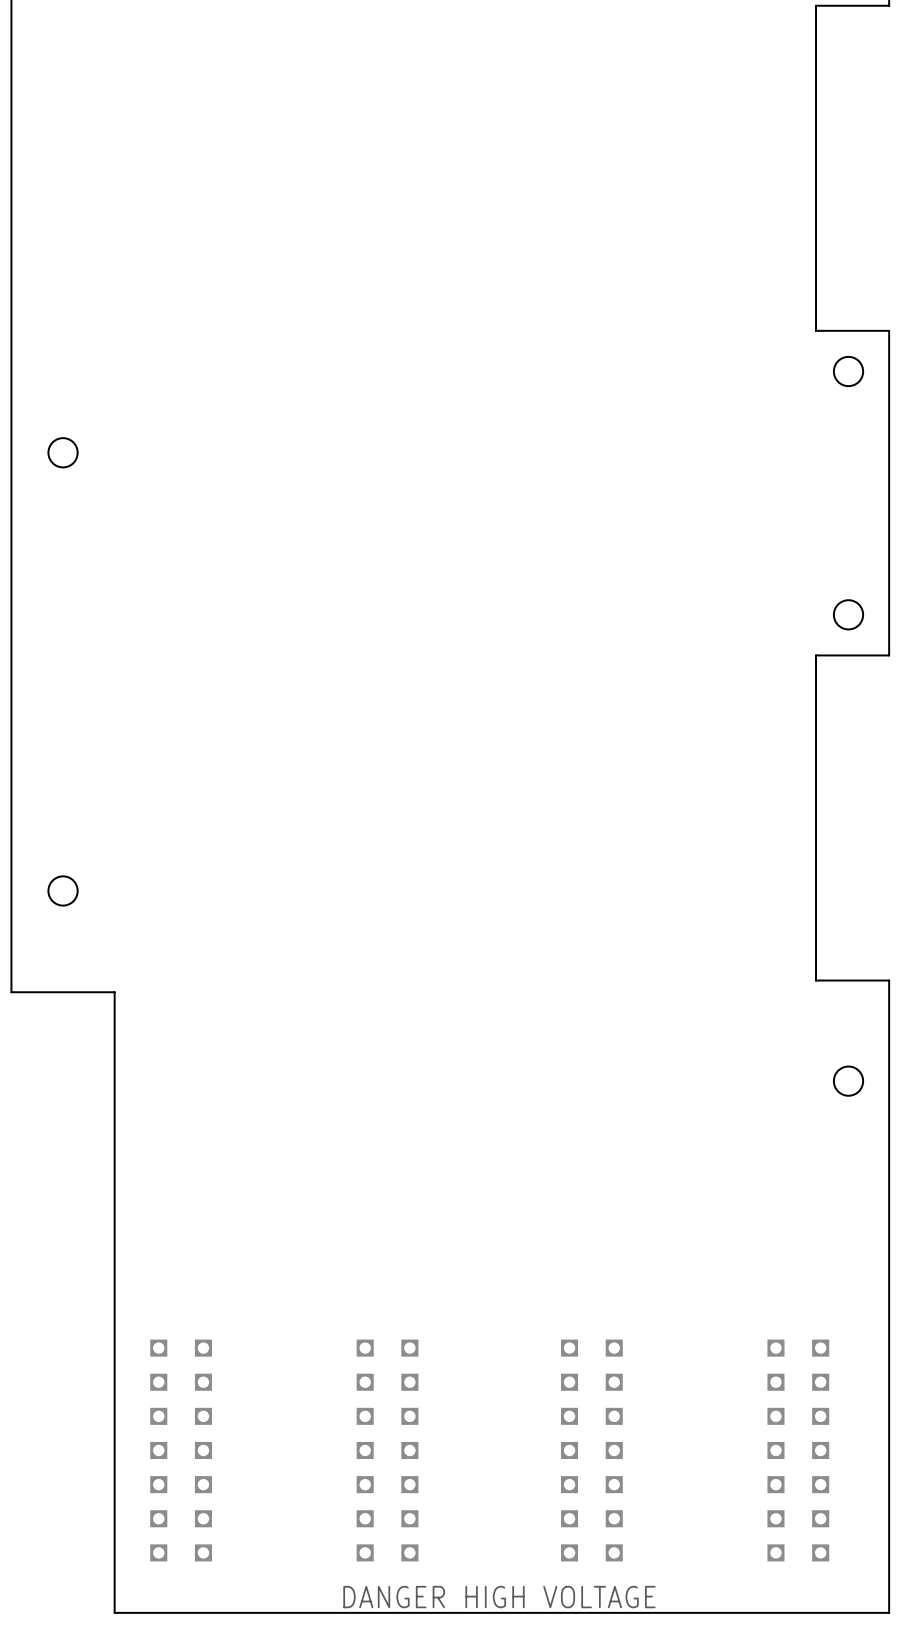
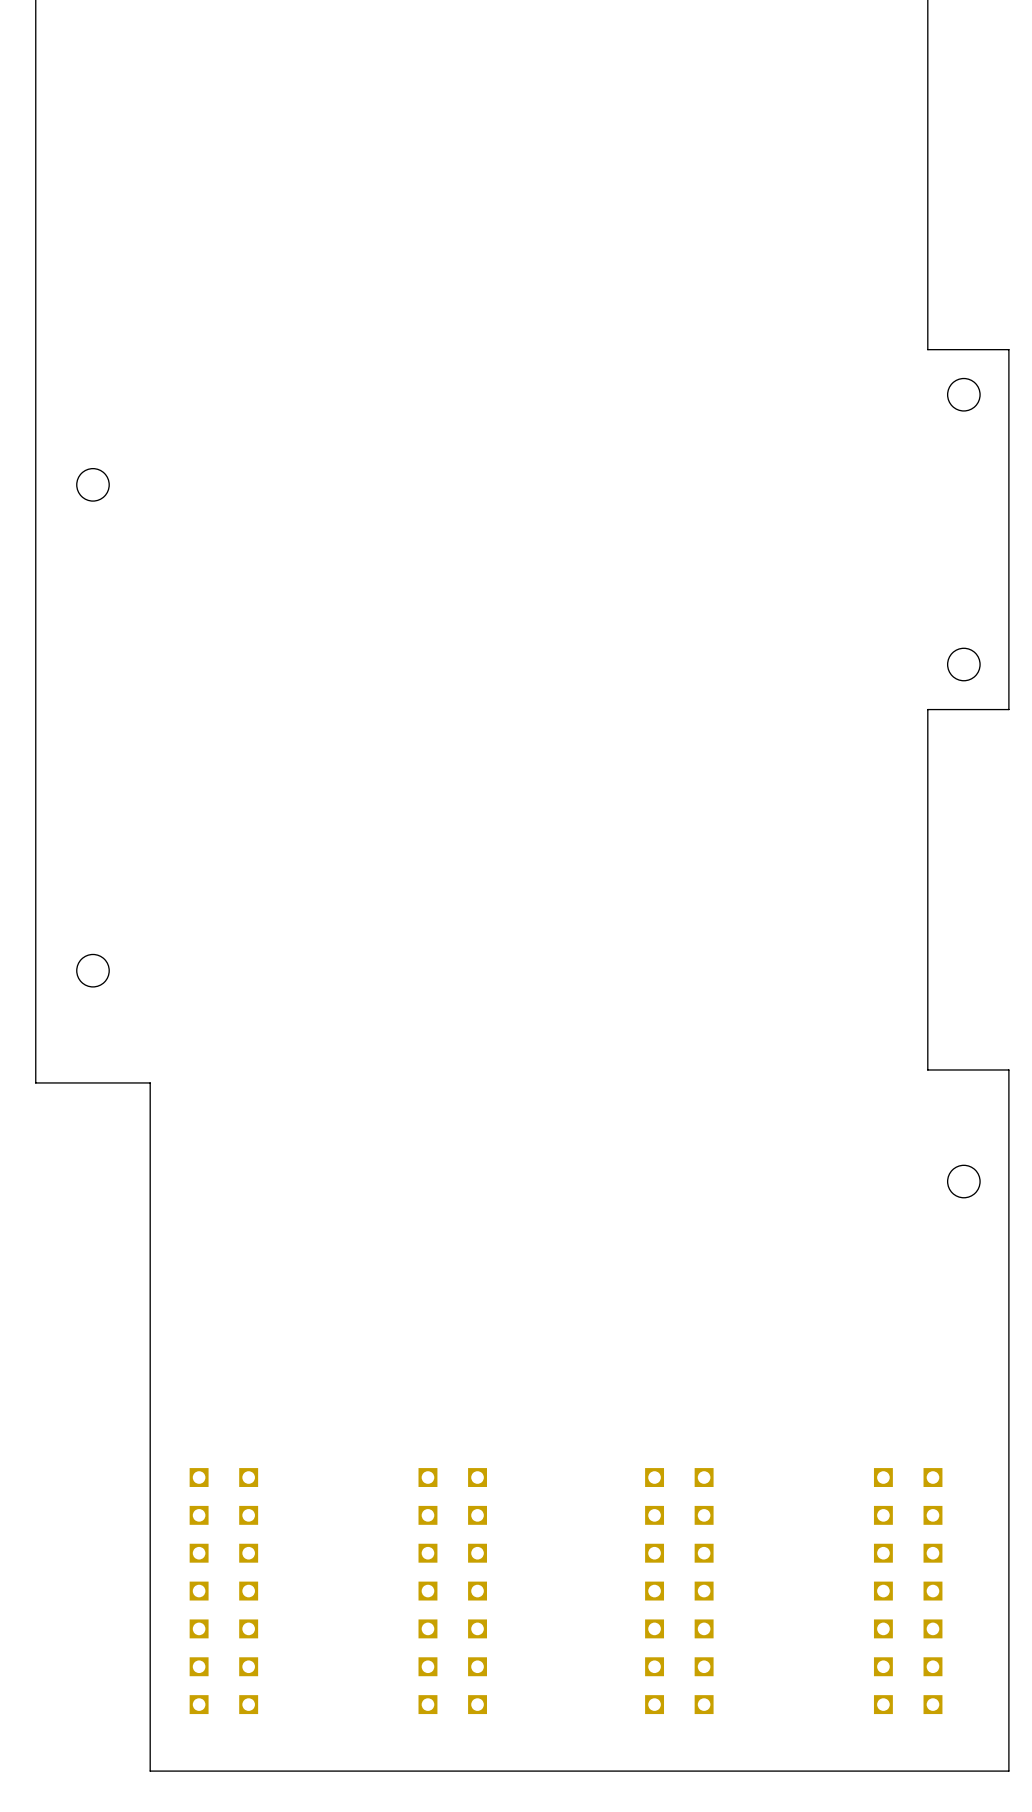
text: DANGER HIGH VOLTAGE (499, 1597) -> none

